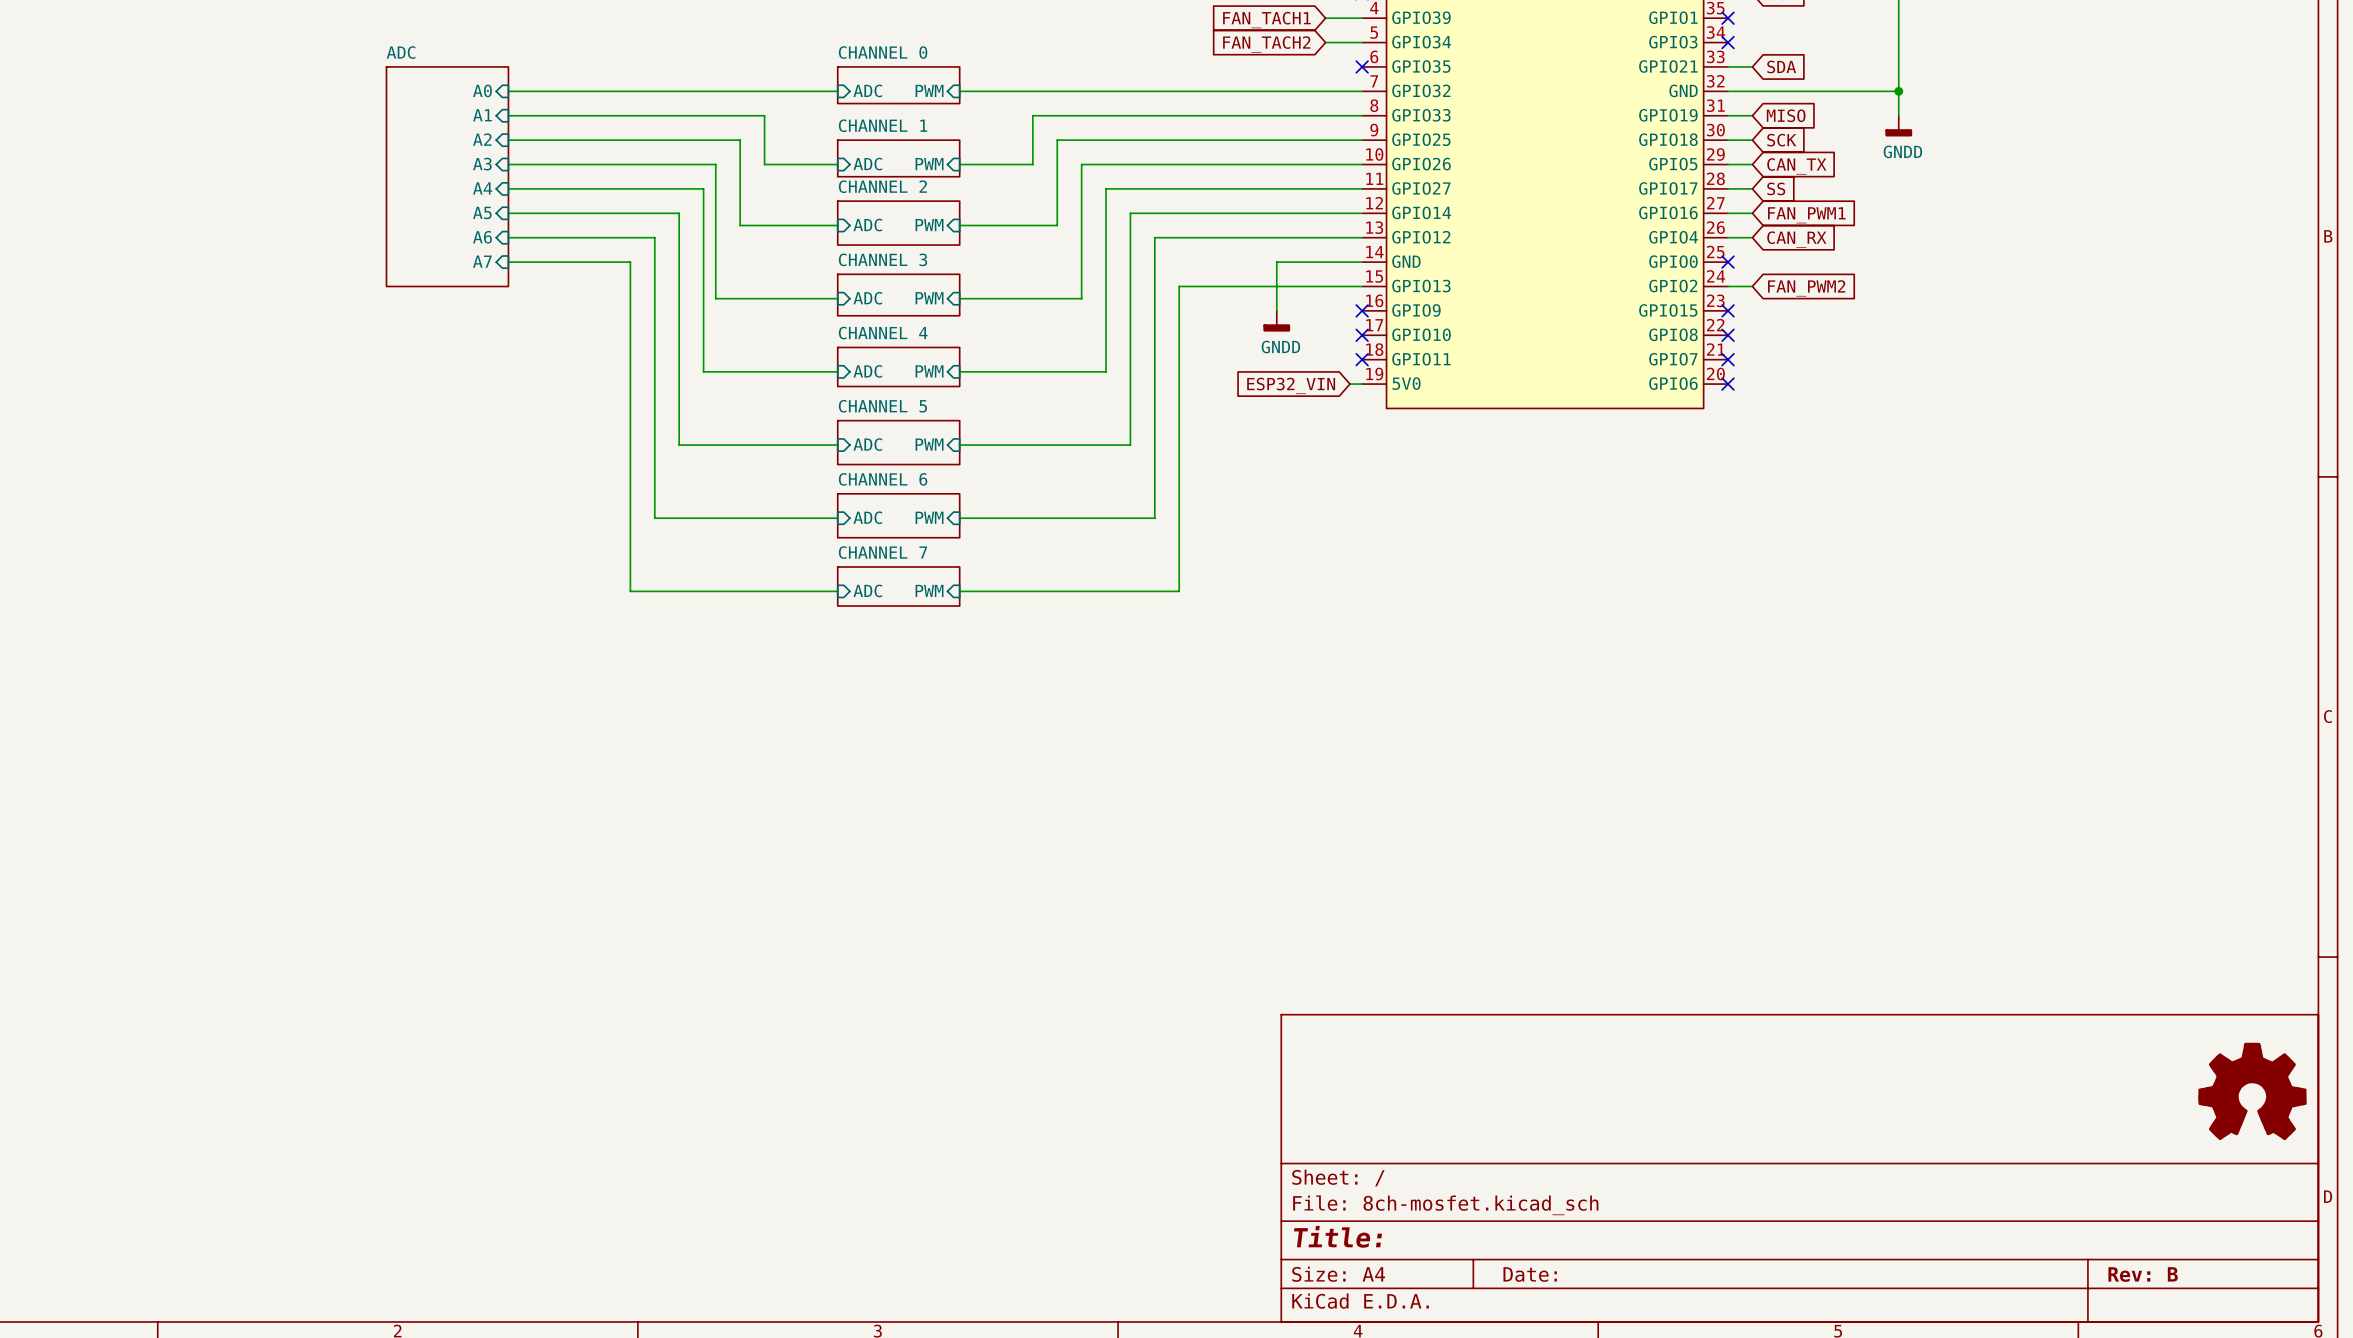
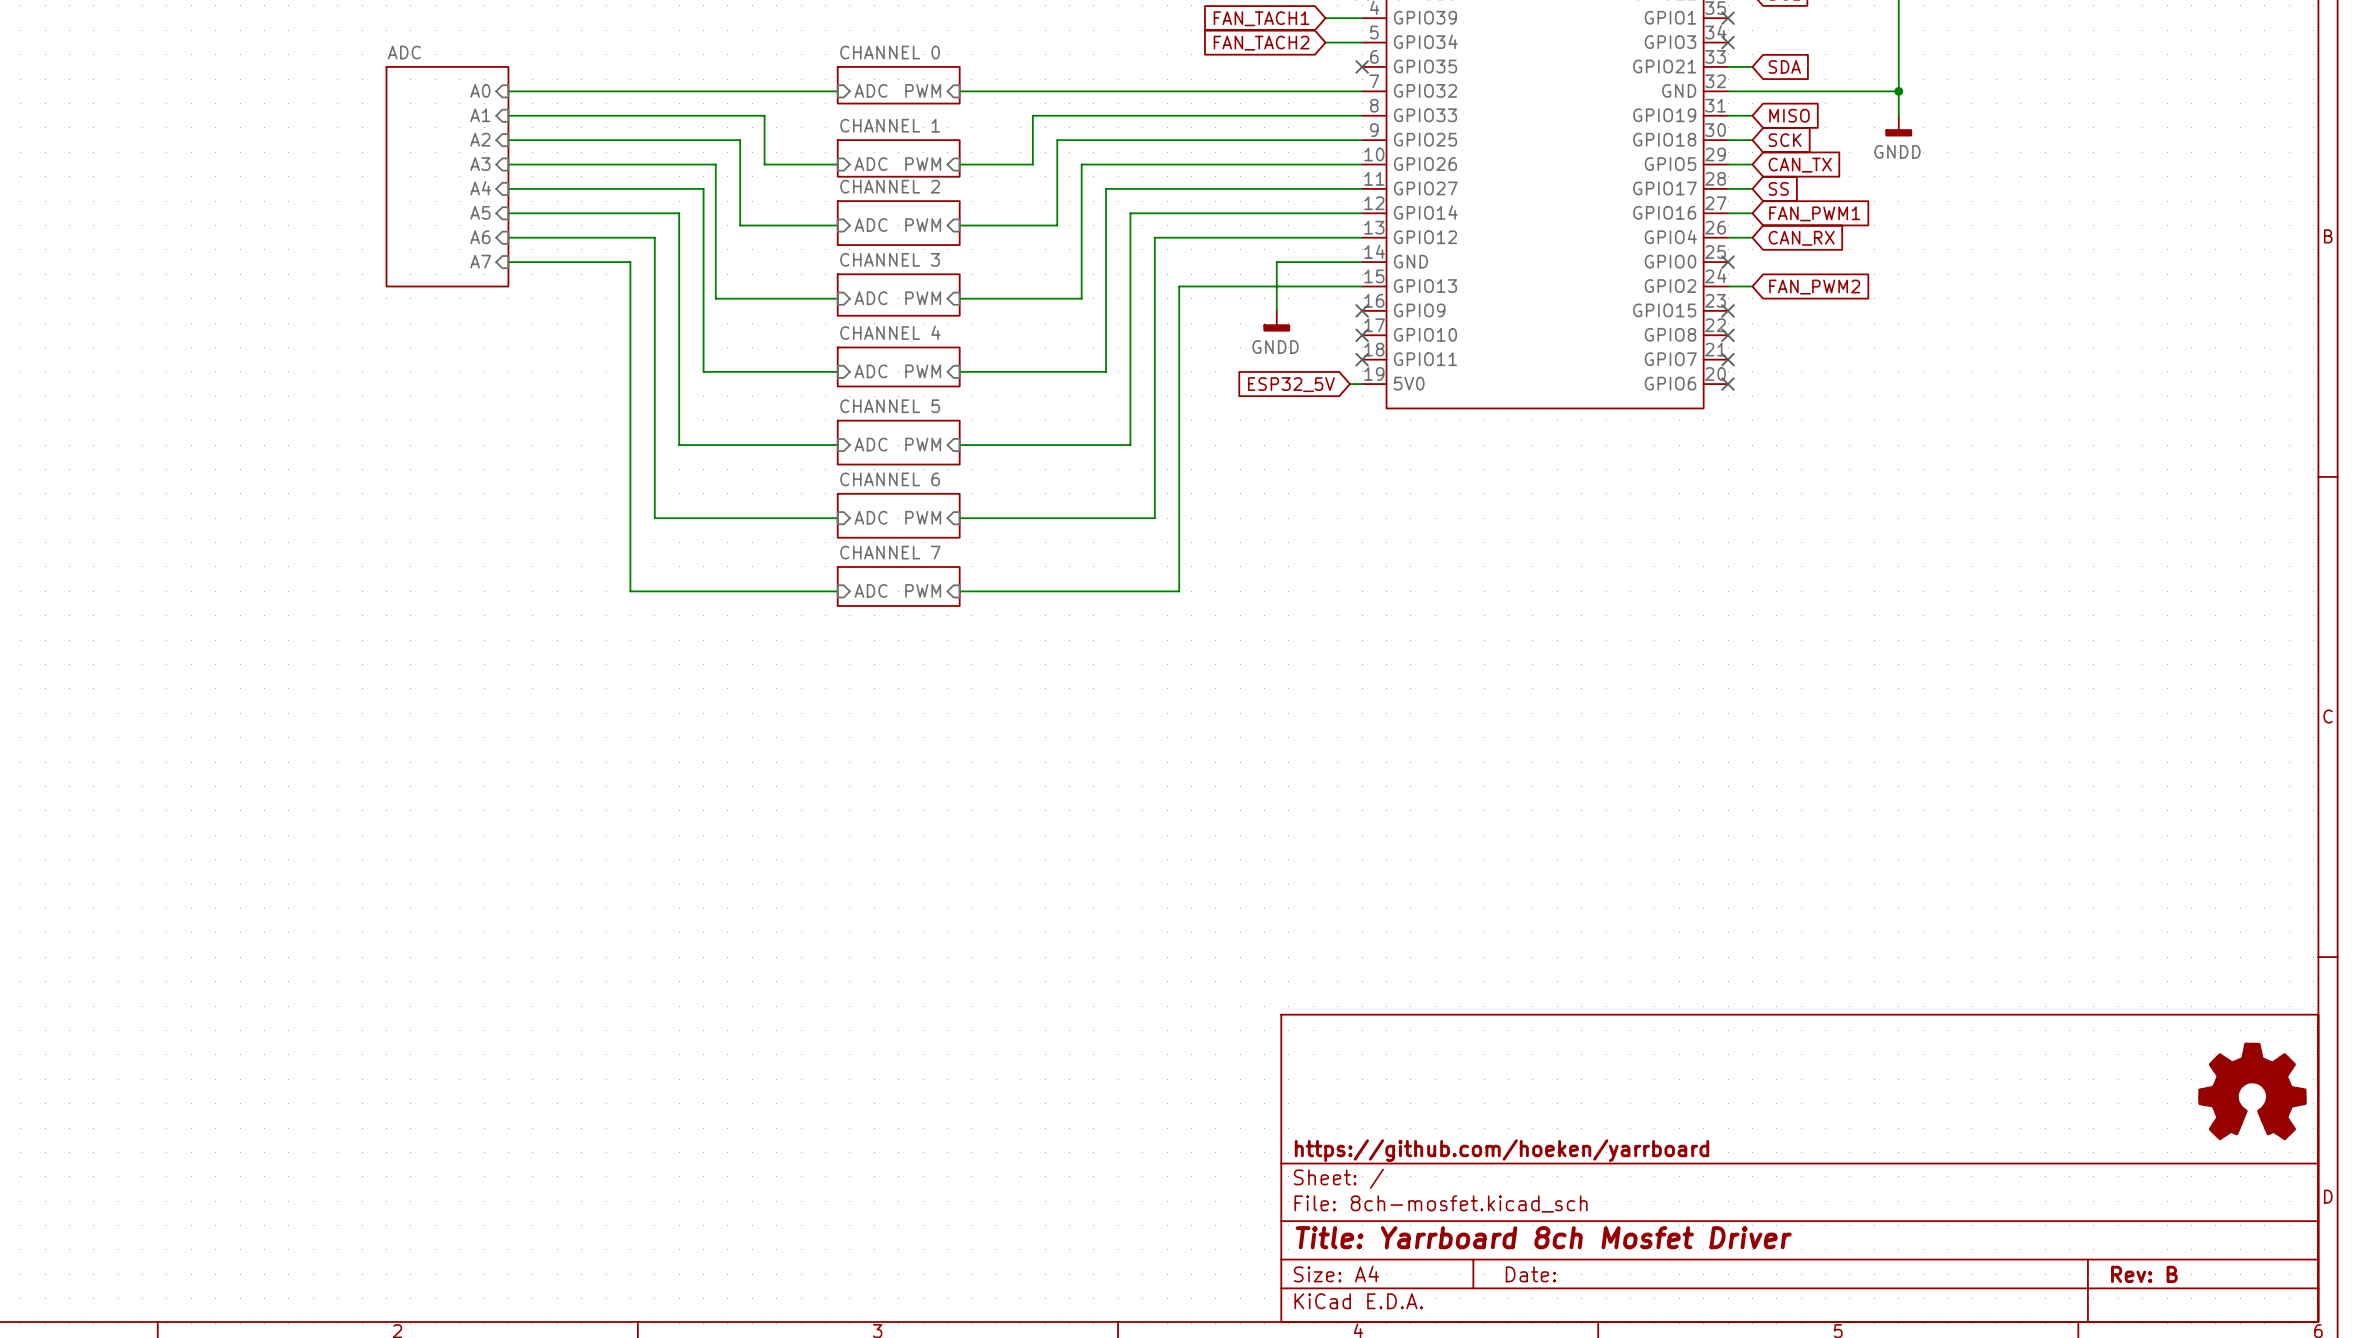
global label: ESP32_VIN (1291, 385) -> ESP32_5V (1291, 384)
title block: none -> https://github.com/hoeken/yarrboard (1501, 1150)
title block: Title: (1338, 1236) -> Title: Yarrboard 8ch Mosfet Driver (1543, 1237)

